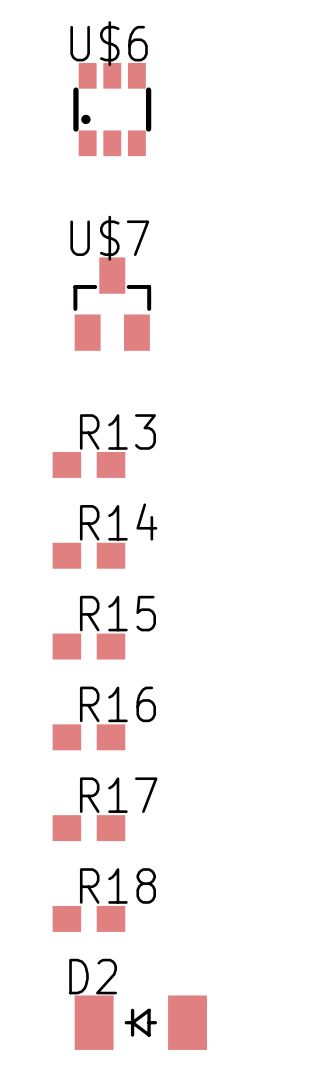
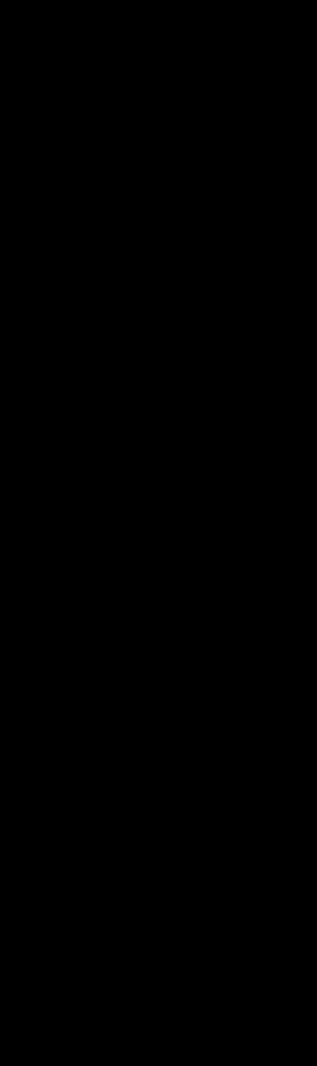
U$6: (112, 109) -> none
U$7: (112, 304) -> none
R13: (88, 464) -> none
R14: (88, 555) -> none
R15: (88, 646) -> none
R16: (88, 737) -> none
R17: (88, 828) -> none
R18: (88, 918) -> none
D2: (140, 1022) -> none

